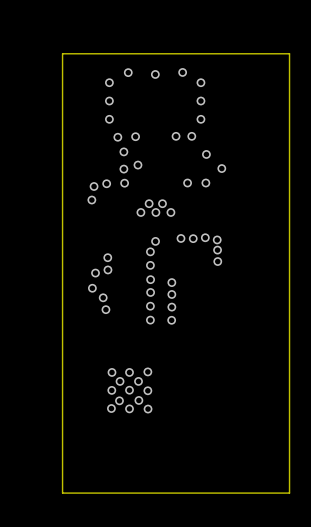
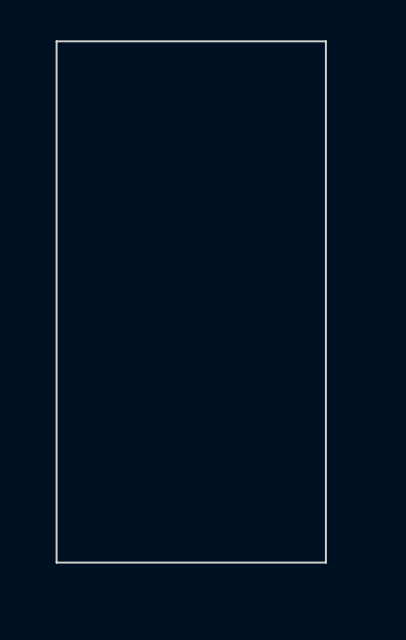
via: (128, 72) -> none
via: (182, 72) -> none
via: (155, 74) -> none
via: (109, 82) -> none
via: (200, 82) -> none
via: (109, 101) -> none
via: (200, 101) -> none
via: (109, 119) -> none
via: (200, 119) -> none
via: (135, 136) -> none
via: (176, 136) -> none
via: (191, 136) -> none
via: (117, 137) -> none
via: (123, 151) -> none
via: (206, 154) -> none
via: (137, 165) -> none
via: (221, 168) -> none
via: (123, 169) -> none
via: (106, 183) -> none
via: (124, 183) -> none
via: (187, 183) -> none
via: (205, 183) -> none
via: (94, 186) -> none
via: (91, 200) -> none
via: (149, 203) -> none
via: (162, 203) -> none
via: (140, 212) -> none
via: (155, 212) -> none
via: (170, 212) -> none
via: (205, 237) -> none
via: (180, 238) -> none
via: (193, 238) -> none
via: (217, 239) -> none
via: (155, 241) -> none
via: (217, 250) -> none
via: (150, 251) -> none
via: (107, 257) -> none
via: (217, 261) -> none
via: (150, 265) -> none
via: (107, 269) -> none
via: (95, 273) -> none
via: (150, 279) -> none
via: (171, 282) -> none
via: (92, 288) -> none
via: (150, 292) -> none
via: (171, 294) -> none
via: (103, 297) -> none
via: (150, 306) -> none
via: (171, 307) -> none
via: (105, 309) -> none
via: (150, 320) -> none
via: (171, 320) -> none
via: (147, 371) -> none
via: (111, 372) -> none
via: (129, 372) -> none
via: (120, 381) -> none
via: (138, 381) -> none
via: (111, 390) -> none
via: (129, 390) -> none
via: (147, 390) -> none
via: (119, 400) -> none
via: (138, 400) -> none
via: (111, 408) -> none
via: (129, 408) -> none
via: (148, 409) -> none

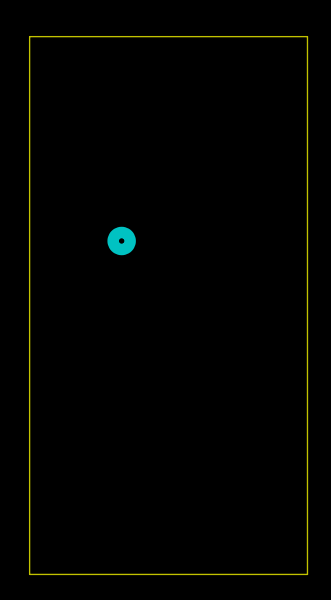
part: none -> (121, 240)

